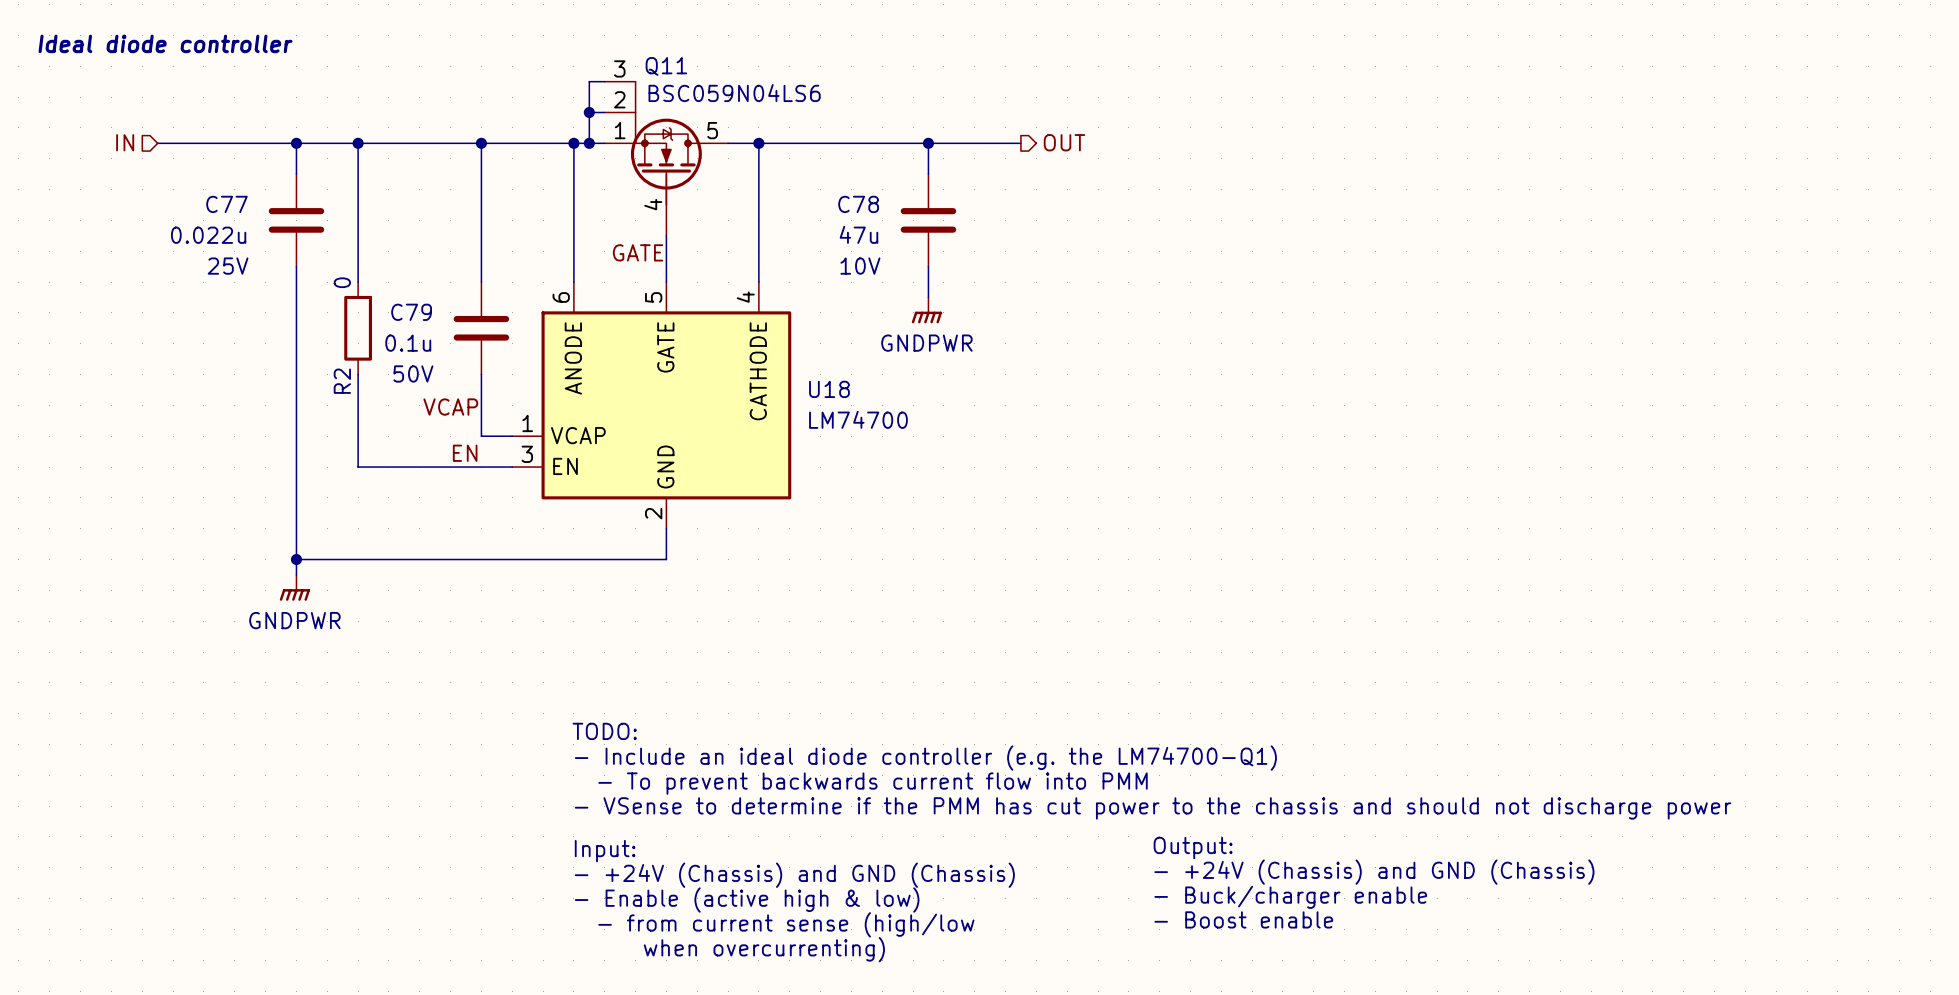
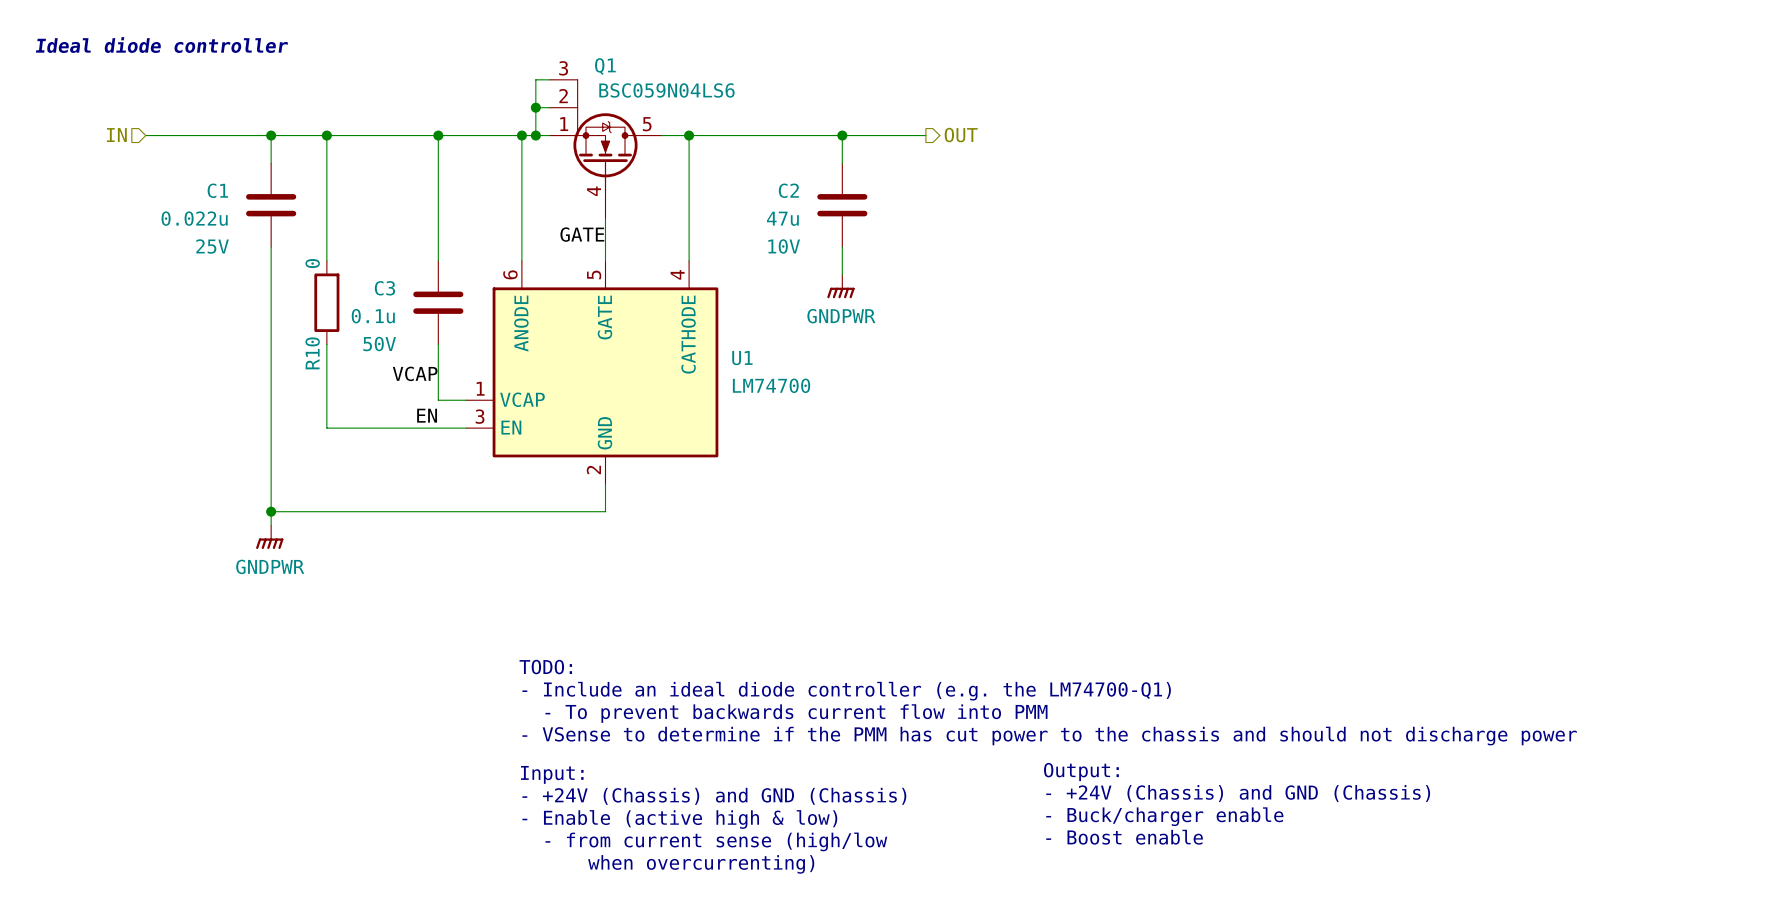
Q11 name: Q11 (666, 66) -> Q1 (605, 66)
C77 name: C77 (226, 204) -> C1 (217, 190)
C78 name: C78 (858, 204) -> C2 (788, 190)
C79 name: C79 (411, 312) -> C3 (384, 288)
R2 name: R2 (342, 381) -> R10 (312, 353)
U18 name: U18 (829, 389) -> U1 (742, 358)

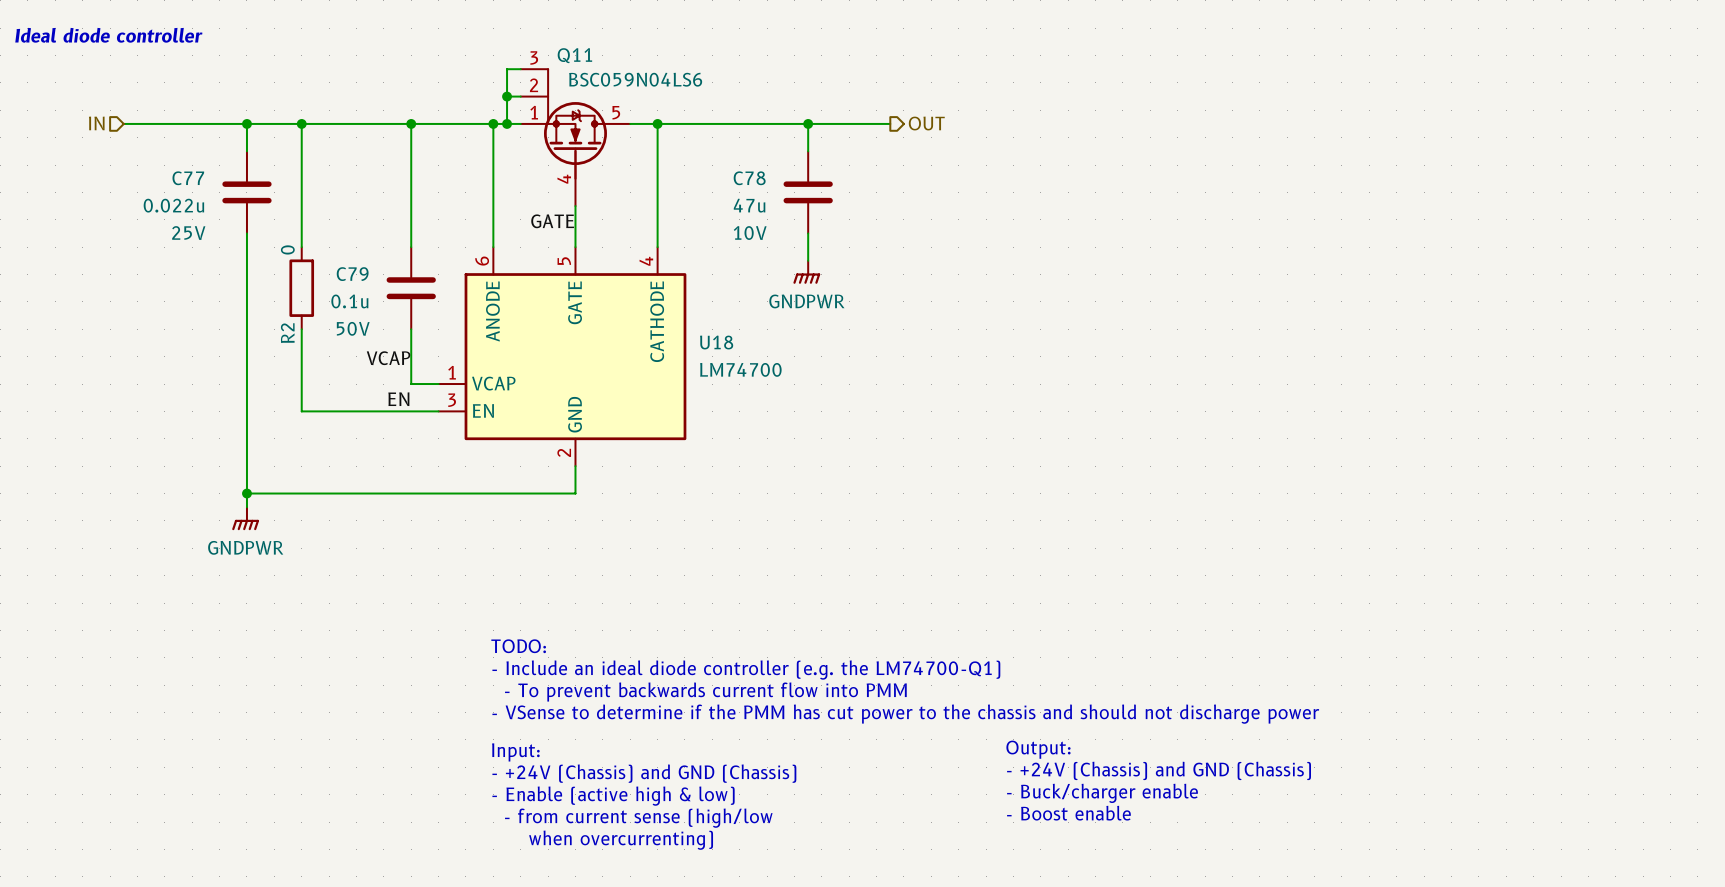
Q1 name: Q1 (605, 66) -> Q11 (574, 55)
C1 name: C1 (217, 190) -> C77 (188, 178)
C2 name: C2 (788, 190) -> C78 (749, 178)
C3 name: C3 (384, 288) -> C79 (352, 274)
R10 name: R10 (312, 353) -> R2 (287, 333)
U1 name: U1 (742, 358) -> U18 (716, 342)

